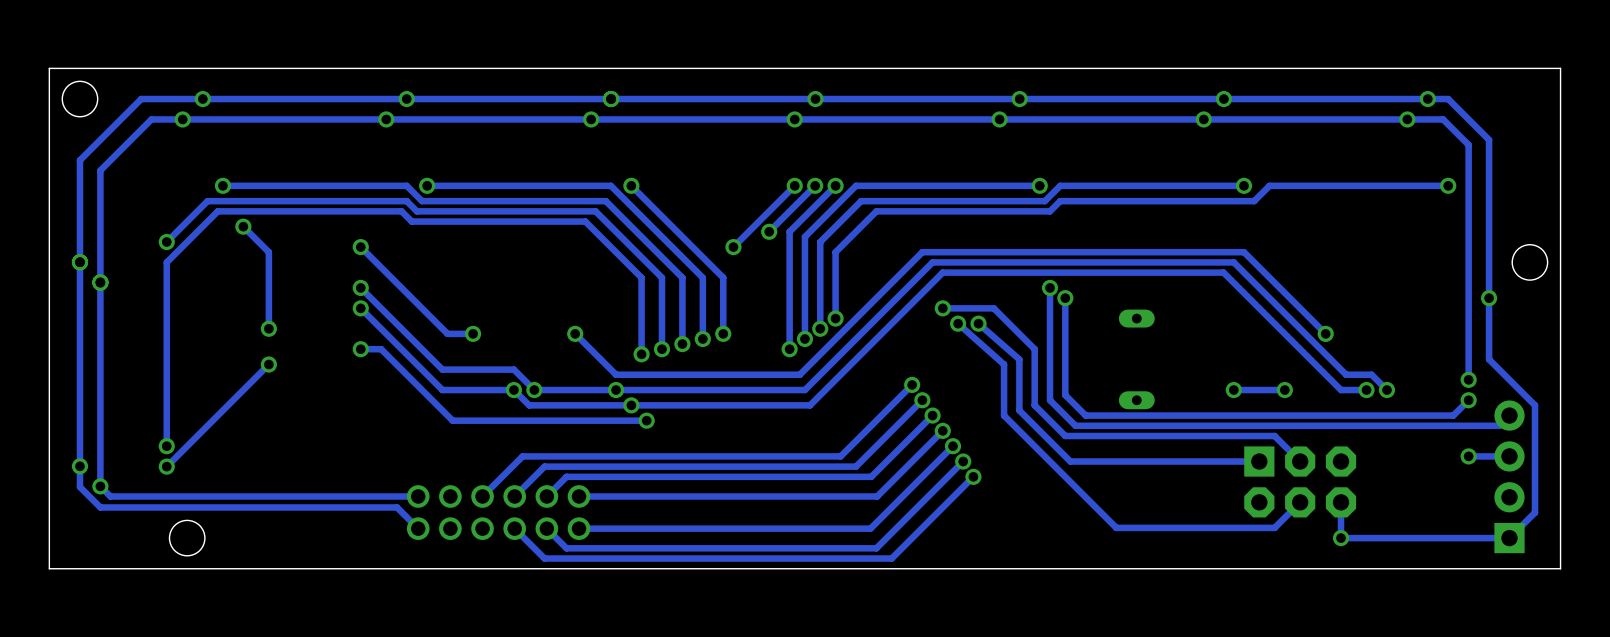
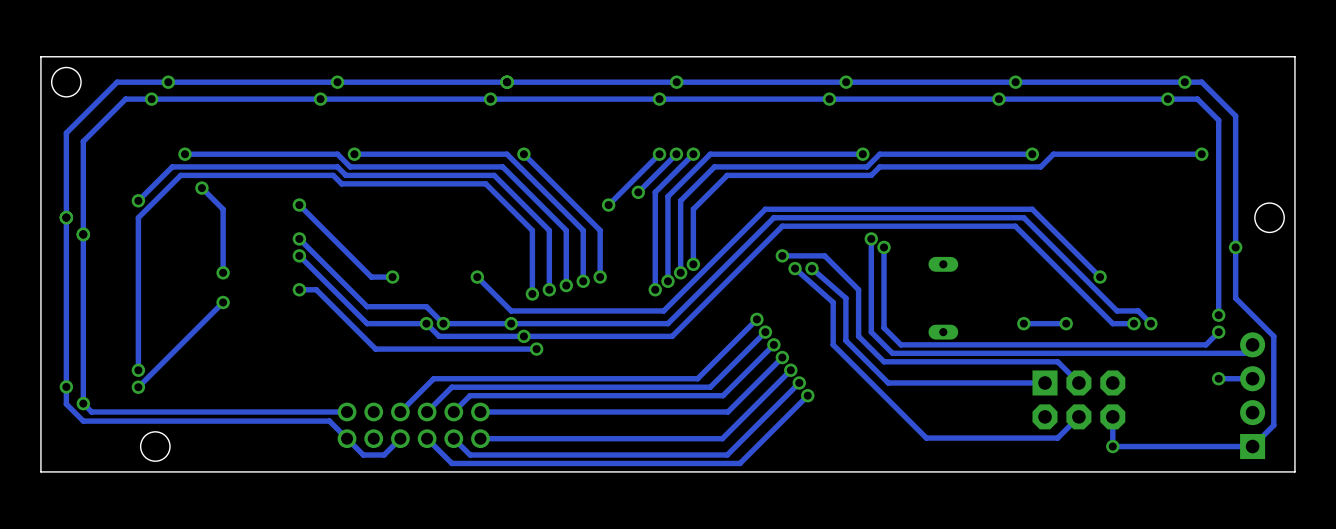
track: none -> (400, 438) (384, 454) (363, 454) (347, 438)

